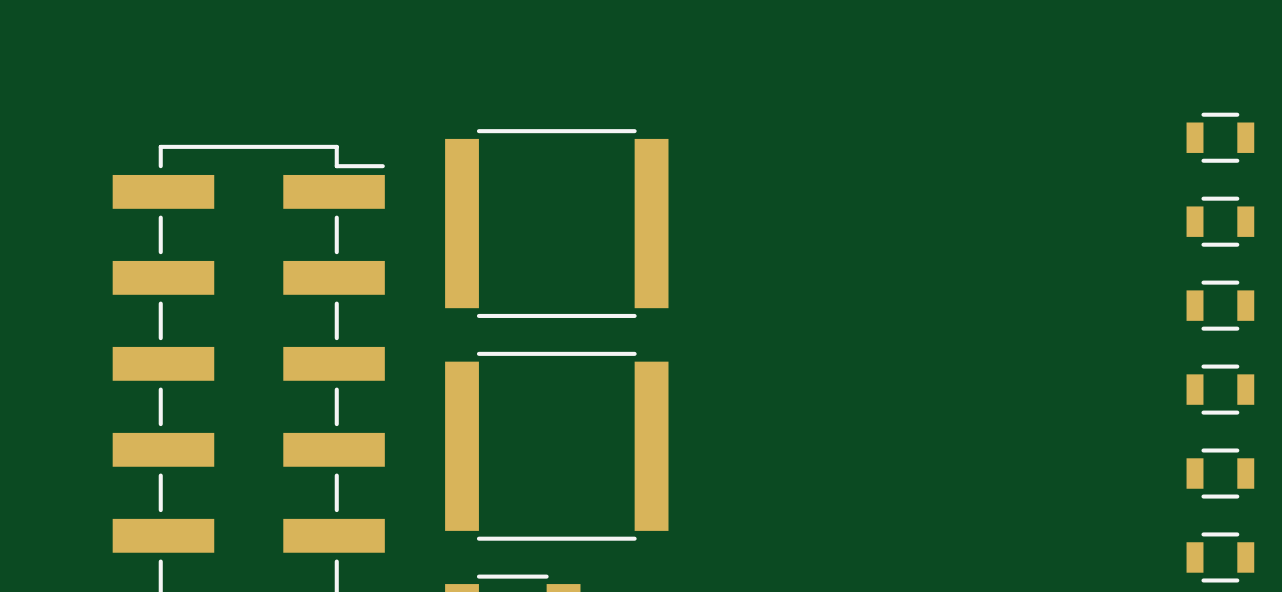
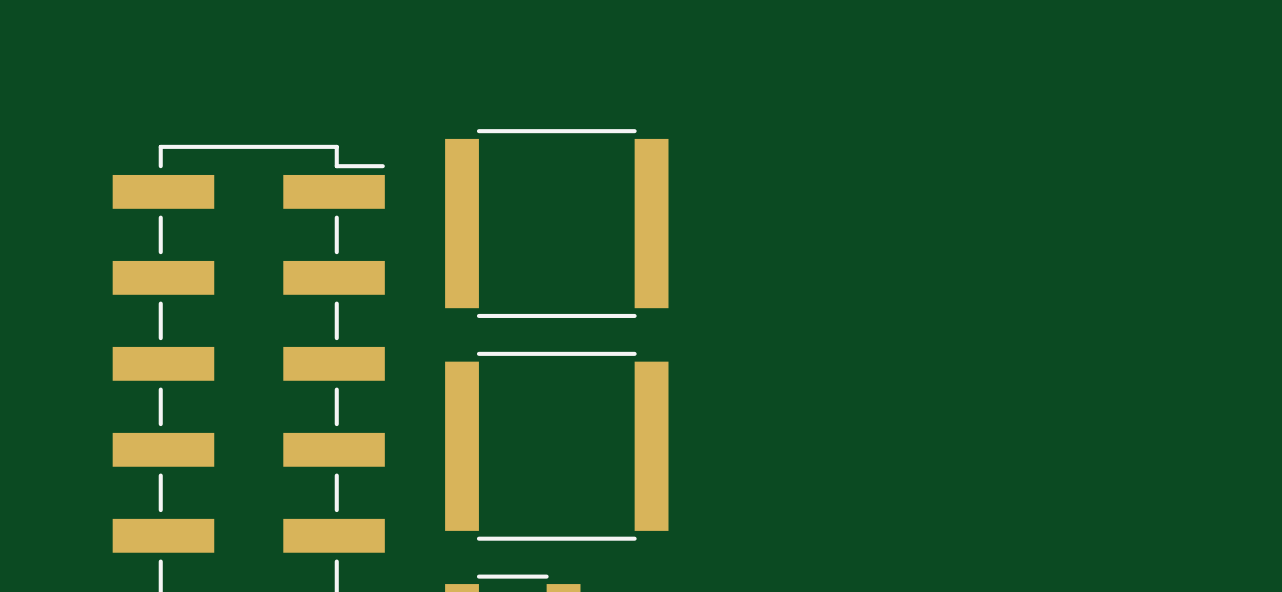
part: (1220, 137) -> none
part: (1220, 221) -> none
part: (1220, 305) -> none
part: (1220, 389) -> none
part: (1220, 473) -> none
part: (1220, 557) -> none

